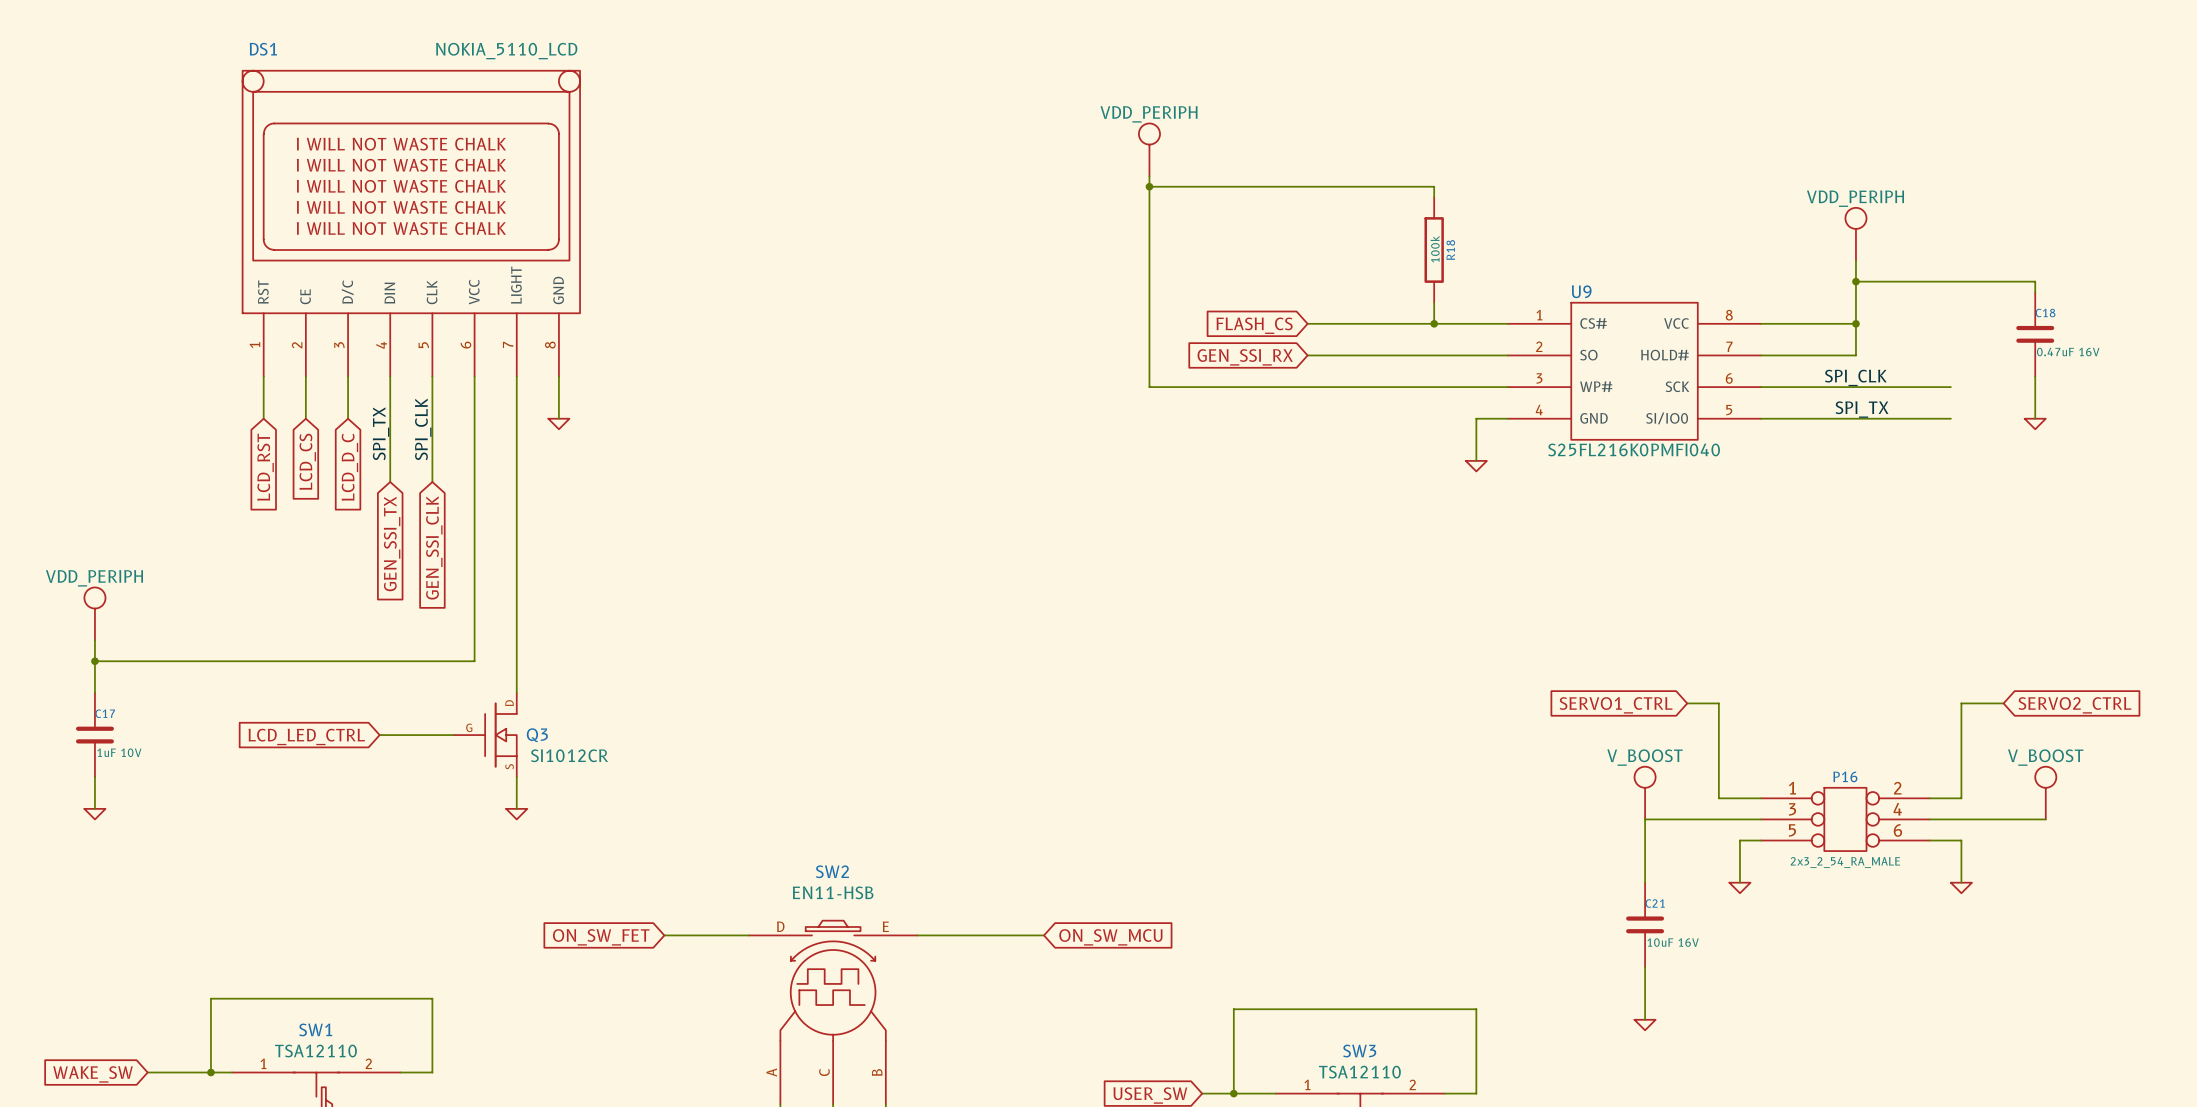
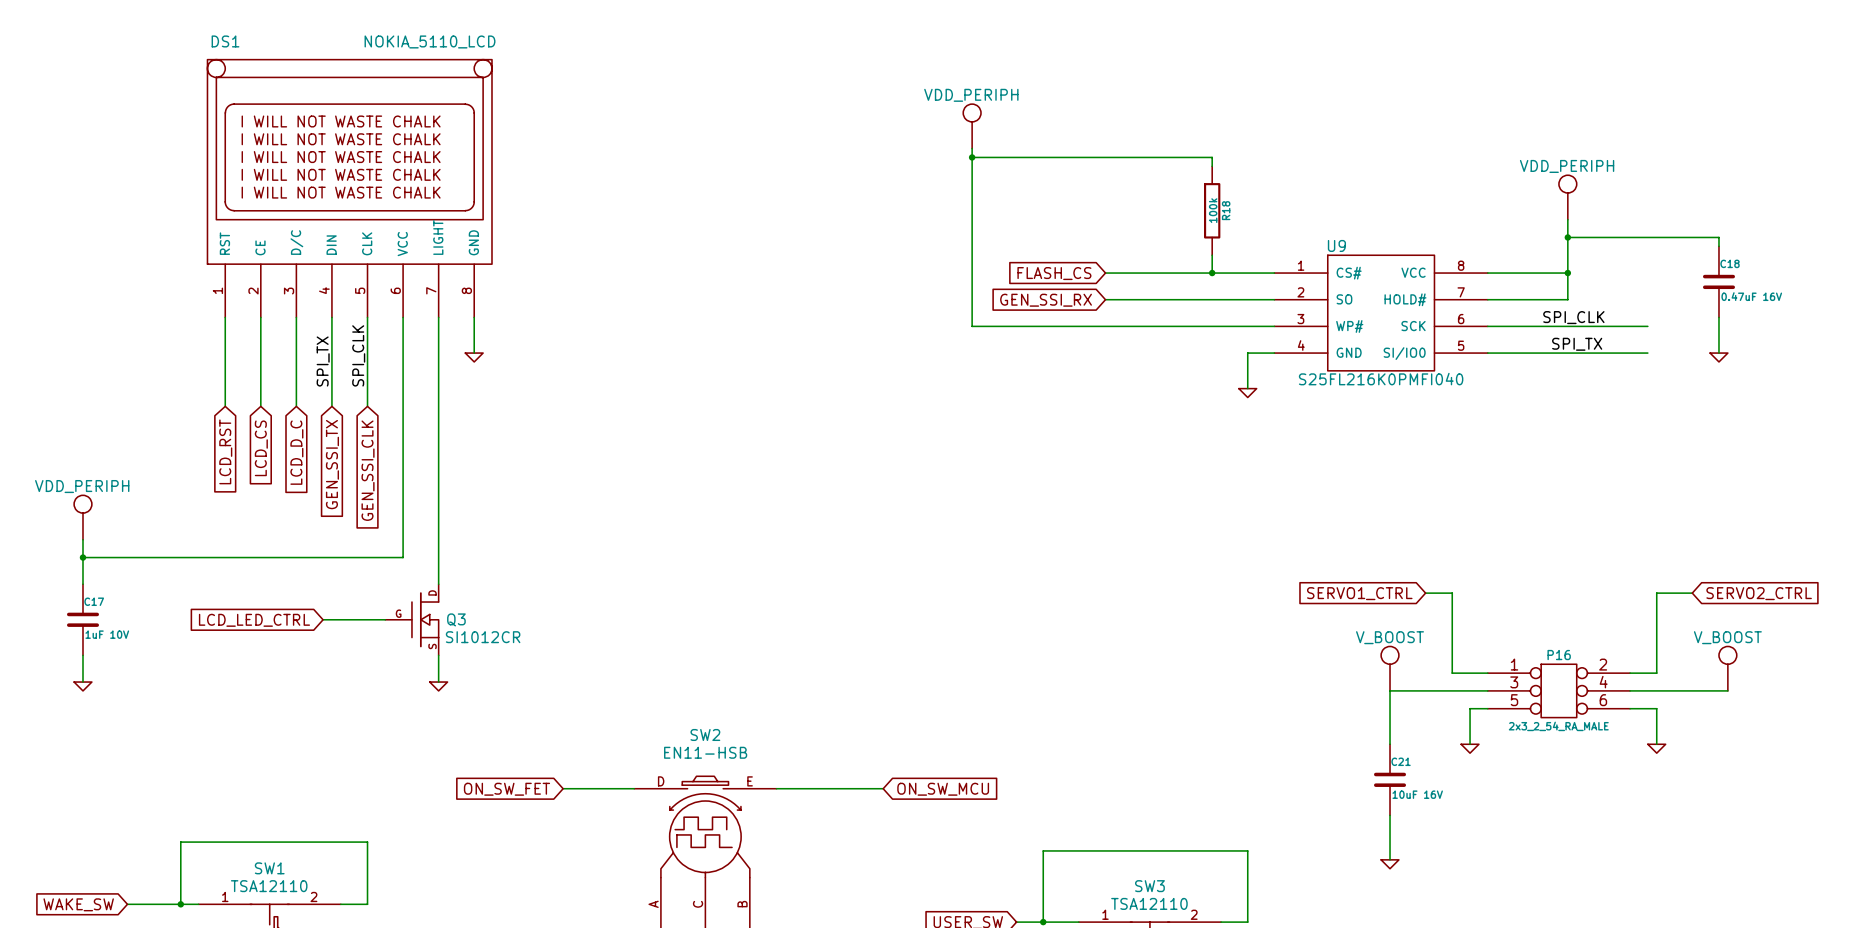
wire: none -> (225, 353) (225, 406)
wire: none -> (260, 353) (260, 406)
wire: none -> (296, 353) (296, 406)
global label position: LCD_CS (307, 461) -> LCD_CS (261, 448)
global label position: LCD_RST (265, 467) -> LCD_RST (225, 451)
global label position: LCD_D_C (349, 467) -> LCD_D_C (296, 452)

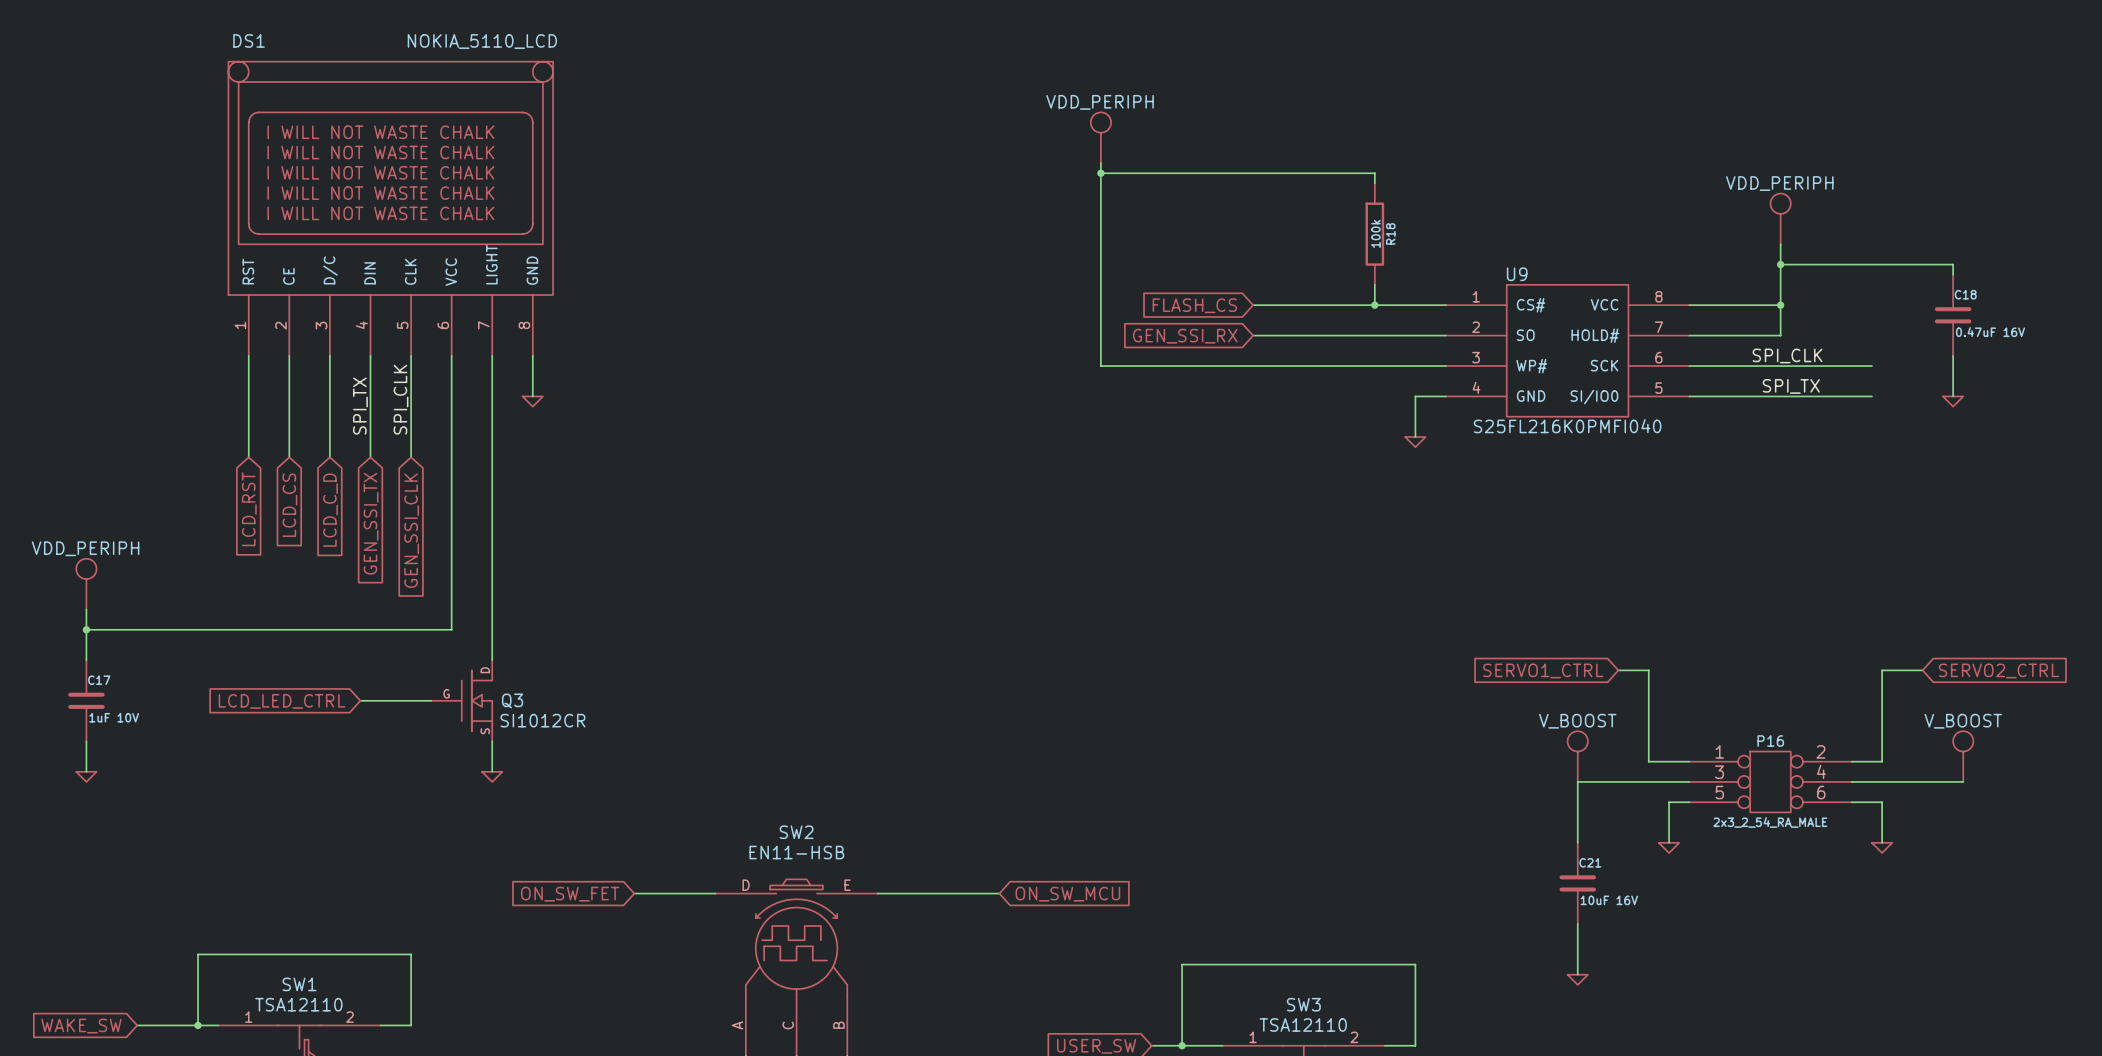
global label: LCD_D_C (296, 452) -> LCD_C_D (330, 510)

